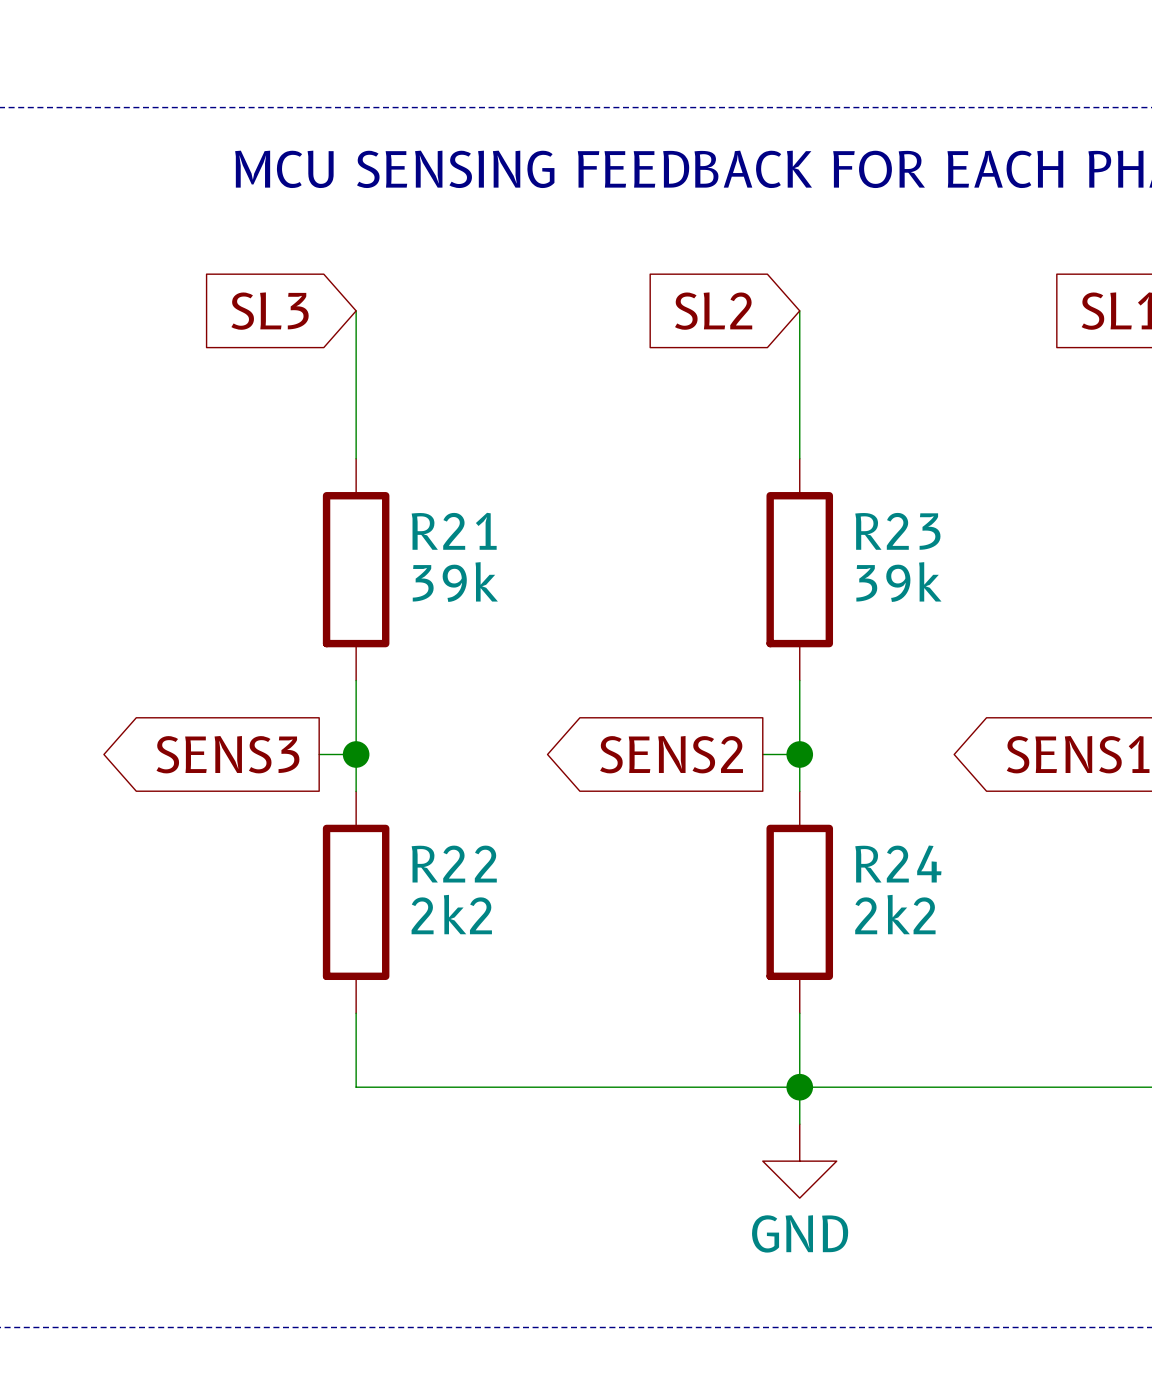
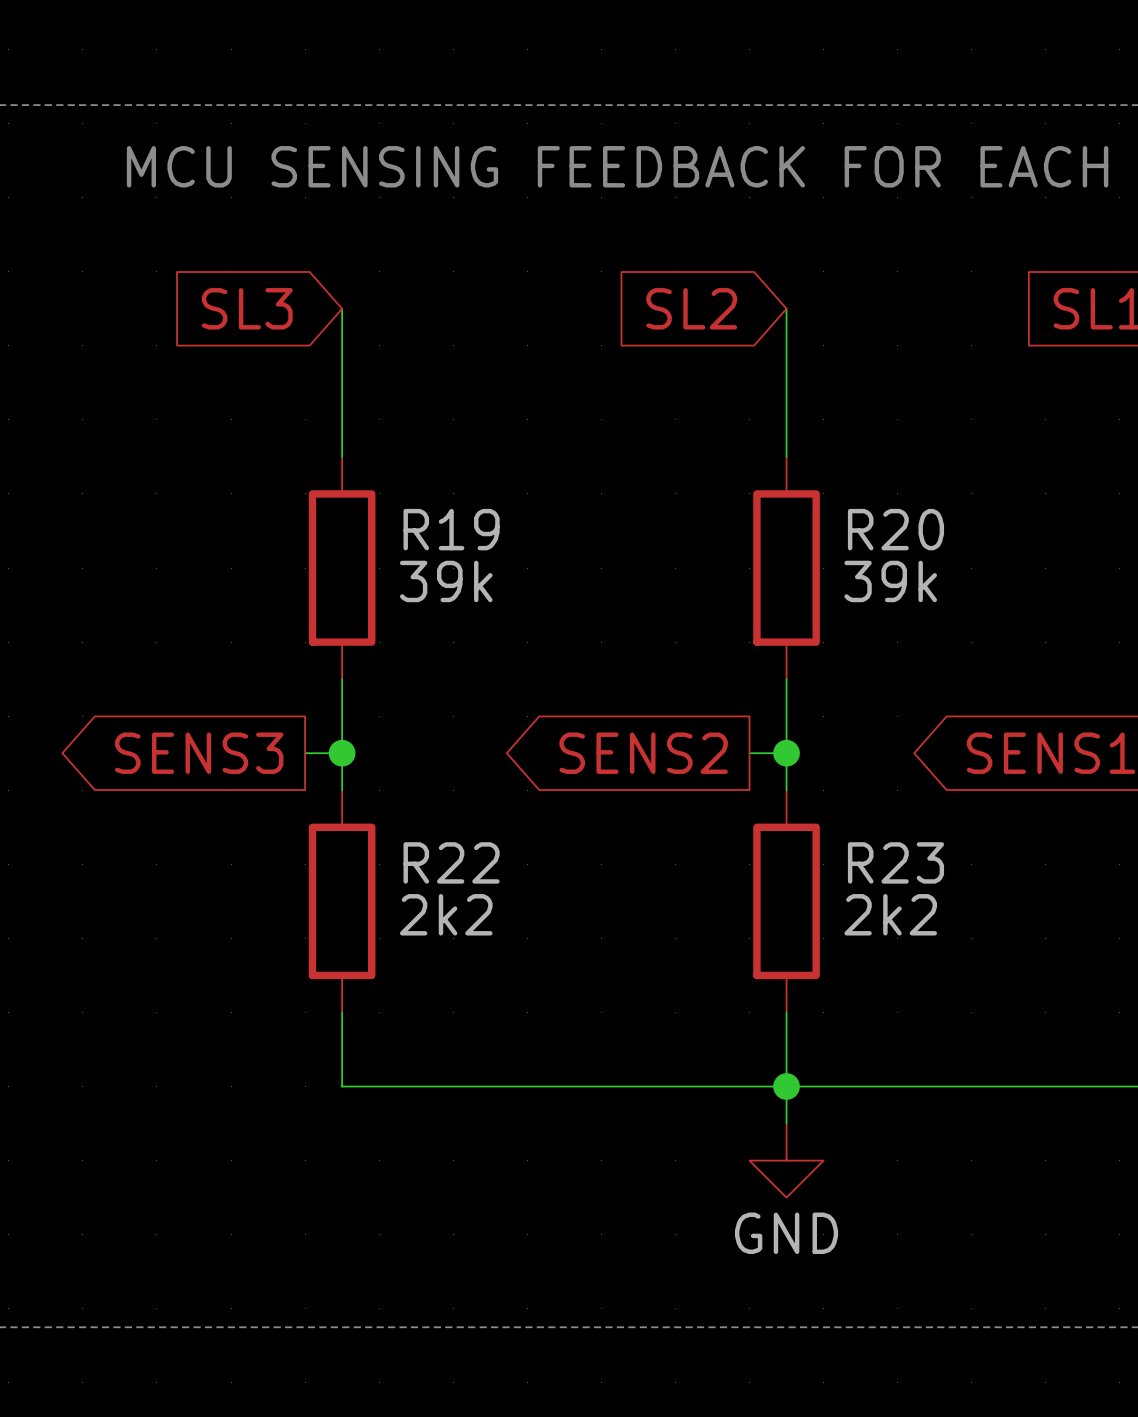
R21 name: R21 (454, 531) -> R19 (451, 529)
R23 name: R23 (897, 531) -> R20 (895, 529)
R24 name: R24 (898, 864) -> R23 (895, 862)

